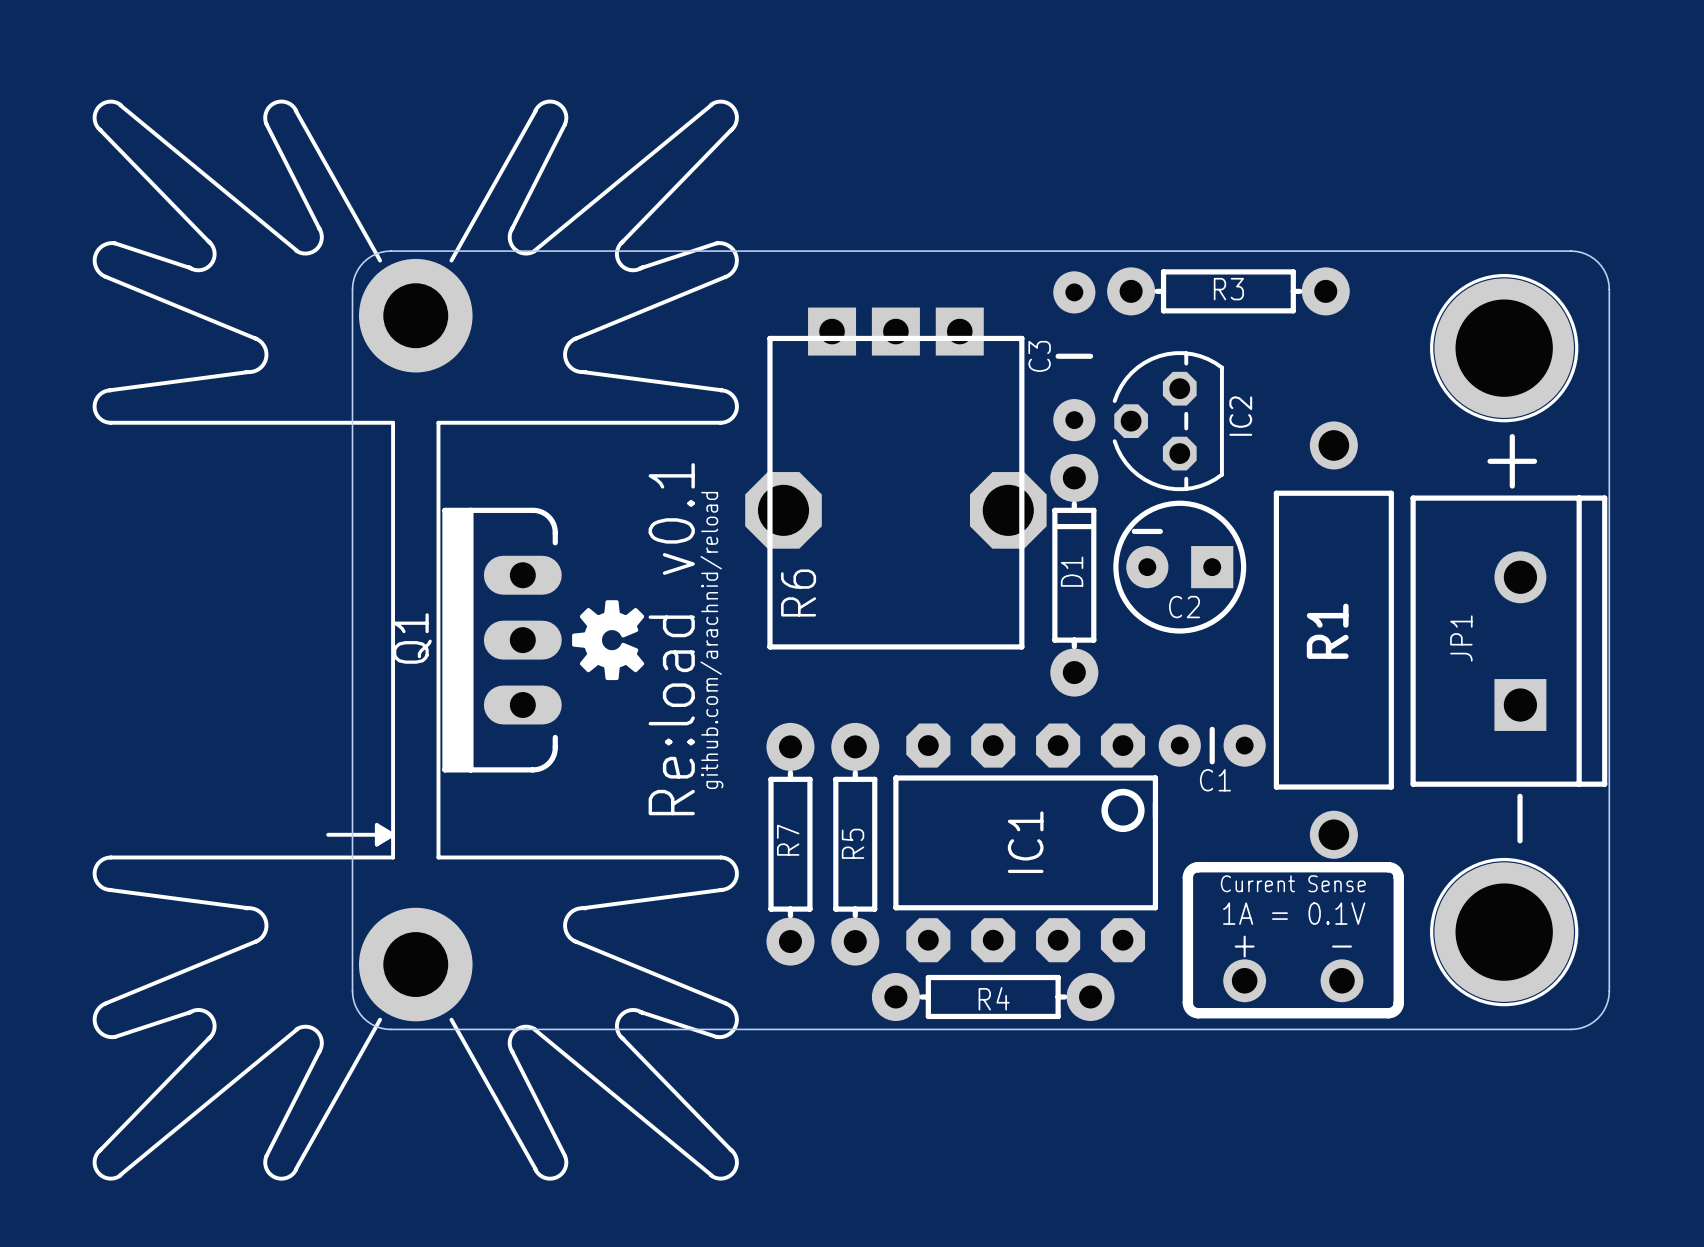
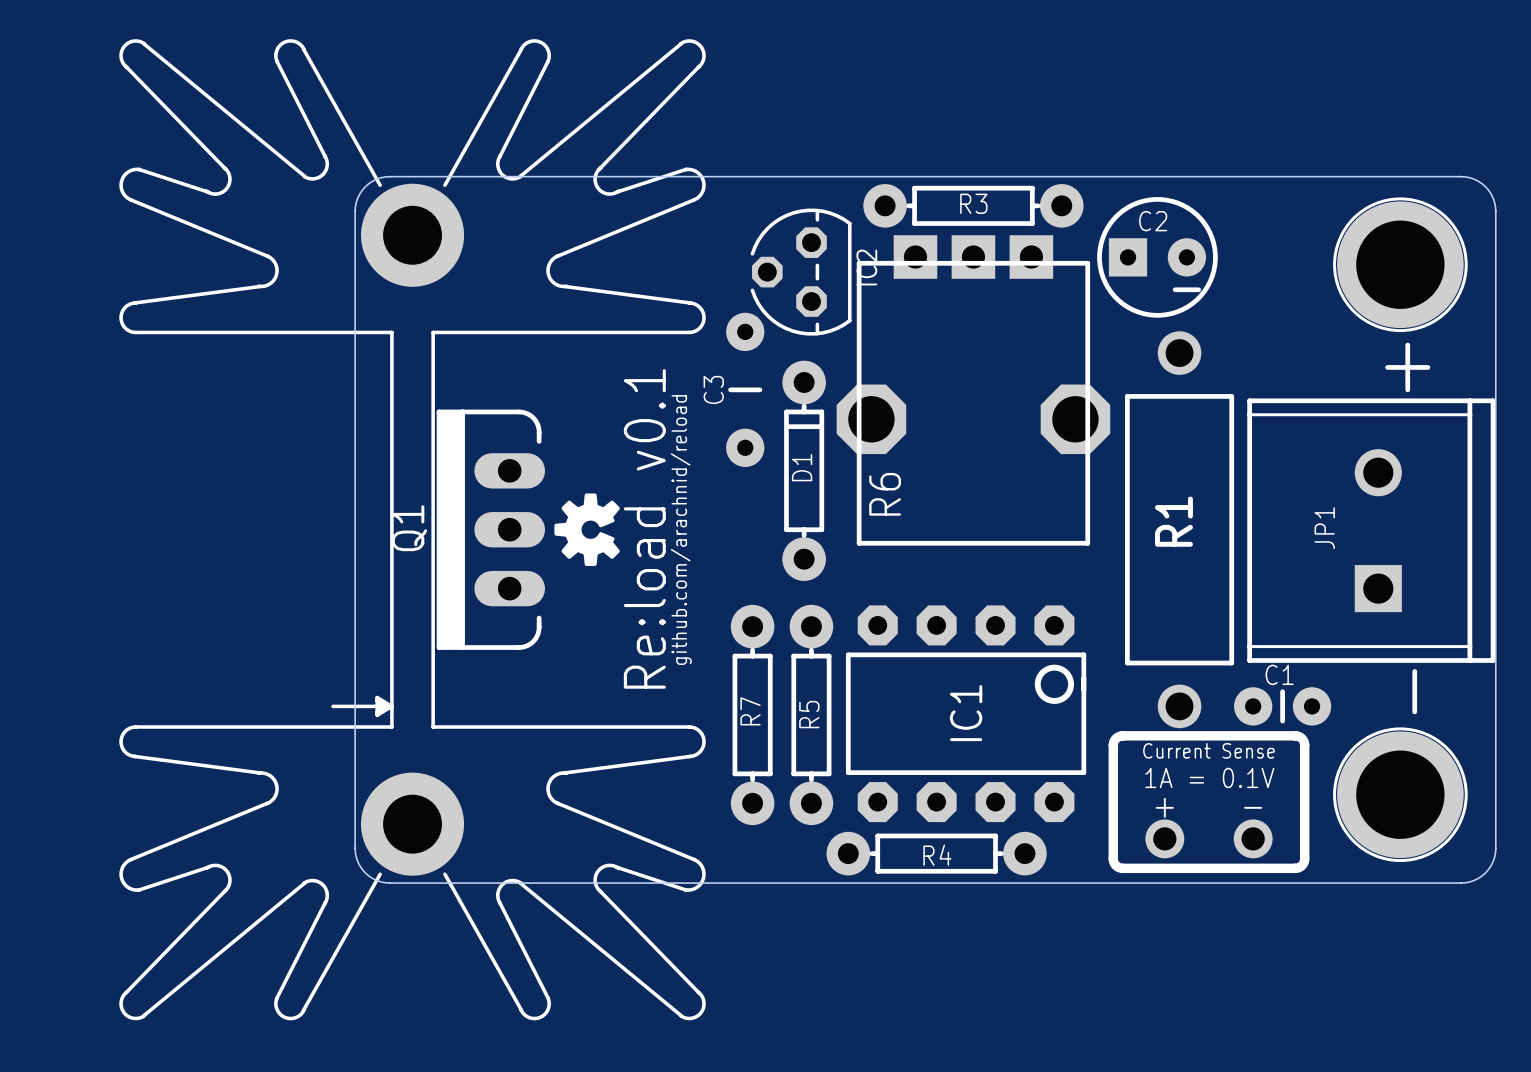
R3 position: (1228, 291) -> (973, 205)
C3 position: (1074, 356) -> (745, 389)
IC2 position: (1168, 421) -> (801, 272)
R6 position: (895, 478) -> (973, 390)
JP1 footprint: [1410, 495, 1608, 787] -> [1247, 398, 1496, 663]
C2 rotation: 0° (1179, 567) -> 180° (1157, 257)
C2 position: (1179, 567) -> (1157, 257)
D1 position: (1074, 575) -> (804, 470)
R1 position: (1333, 640) -> (1179, 529)
C1 position: (1212, 745) -> (1282, 706)
C1 name position: C1 (1215, 780) -> C1 (1279, 674)

